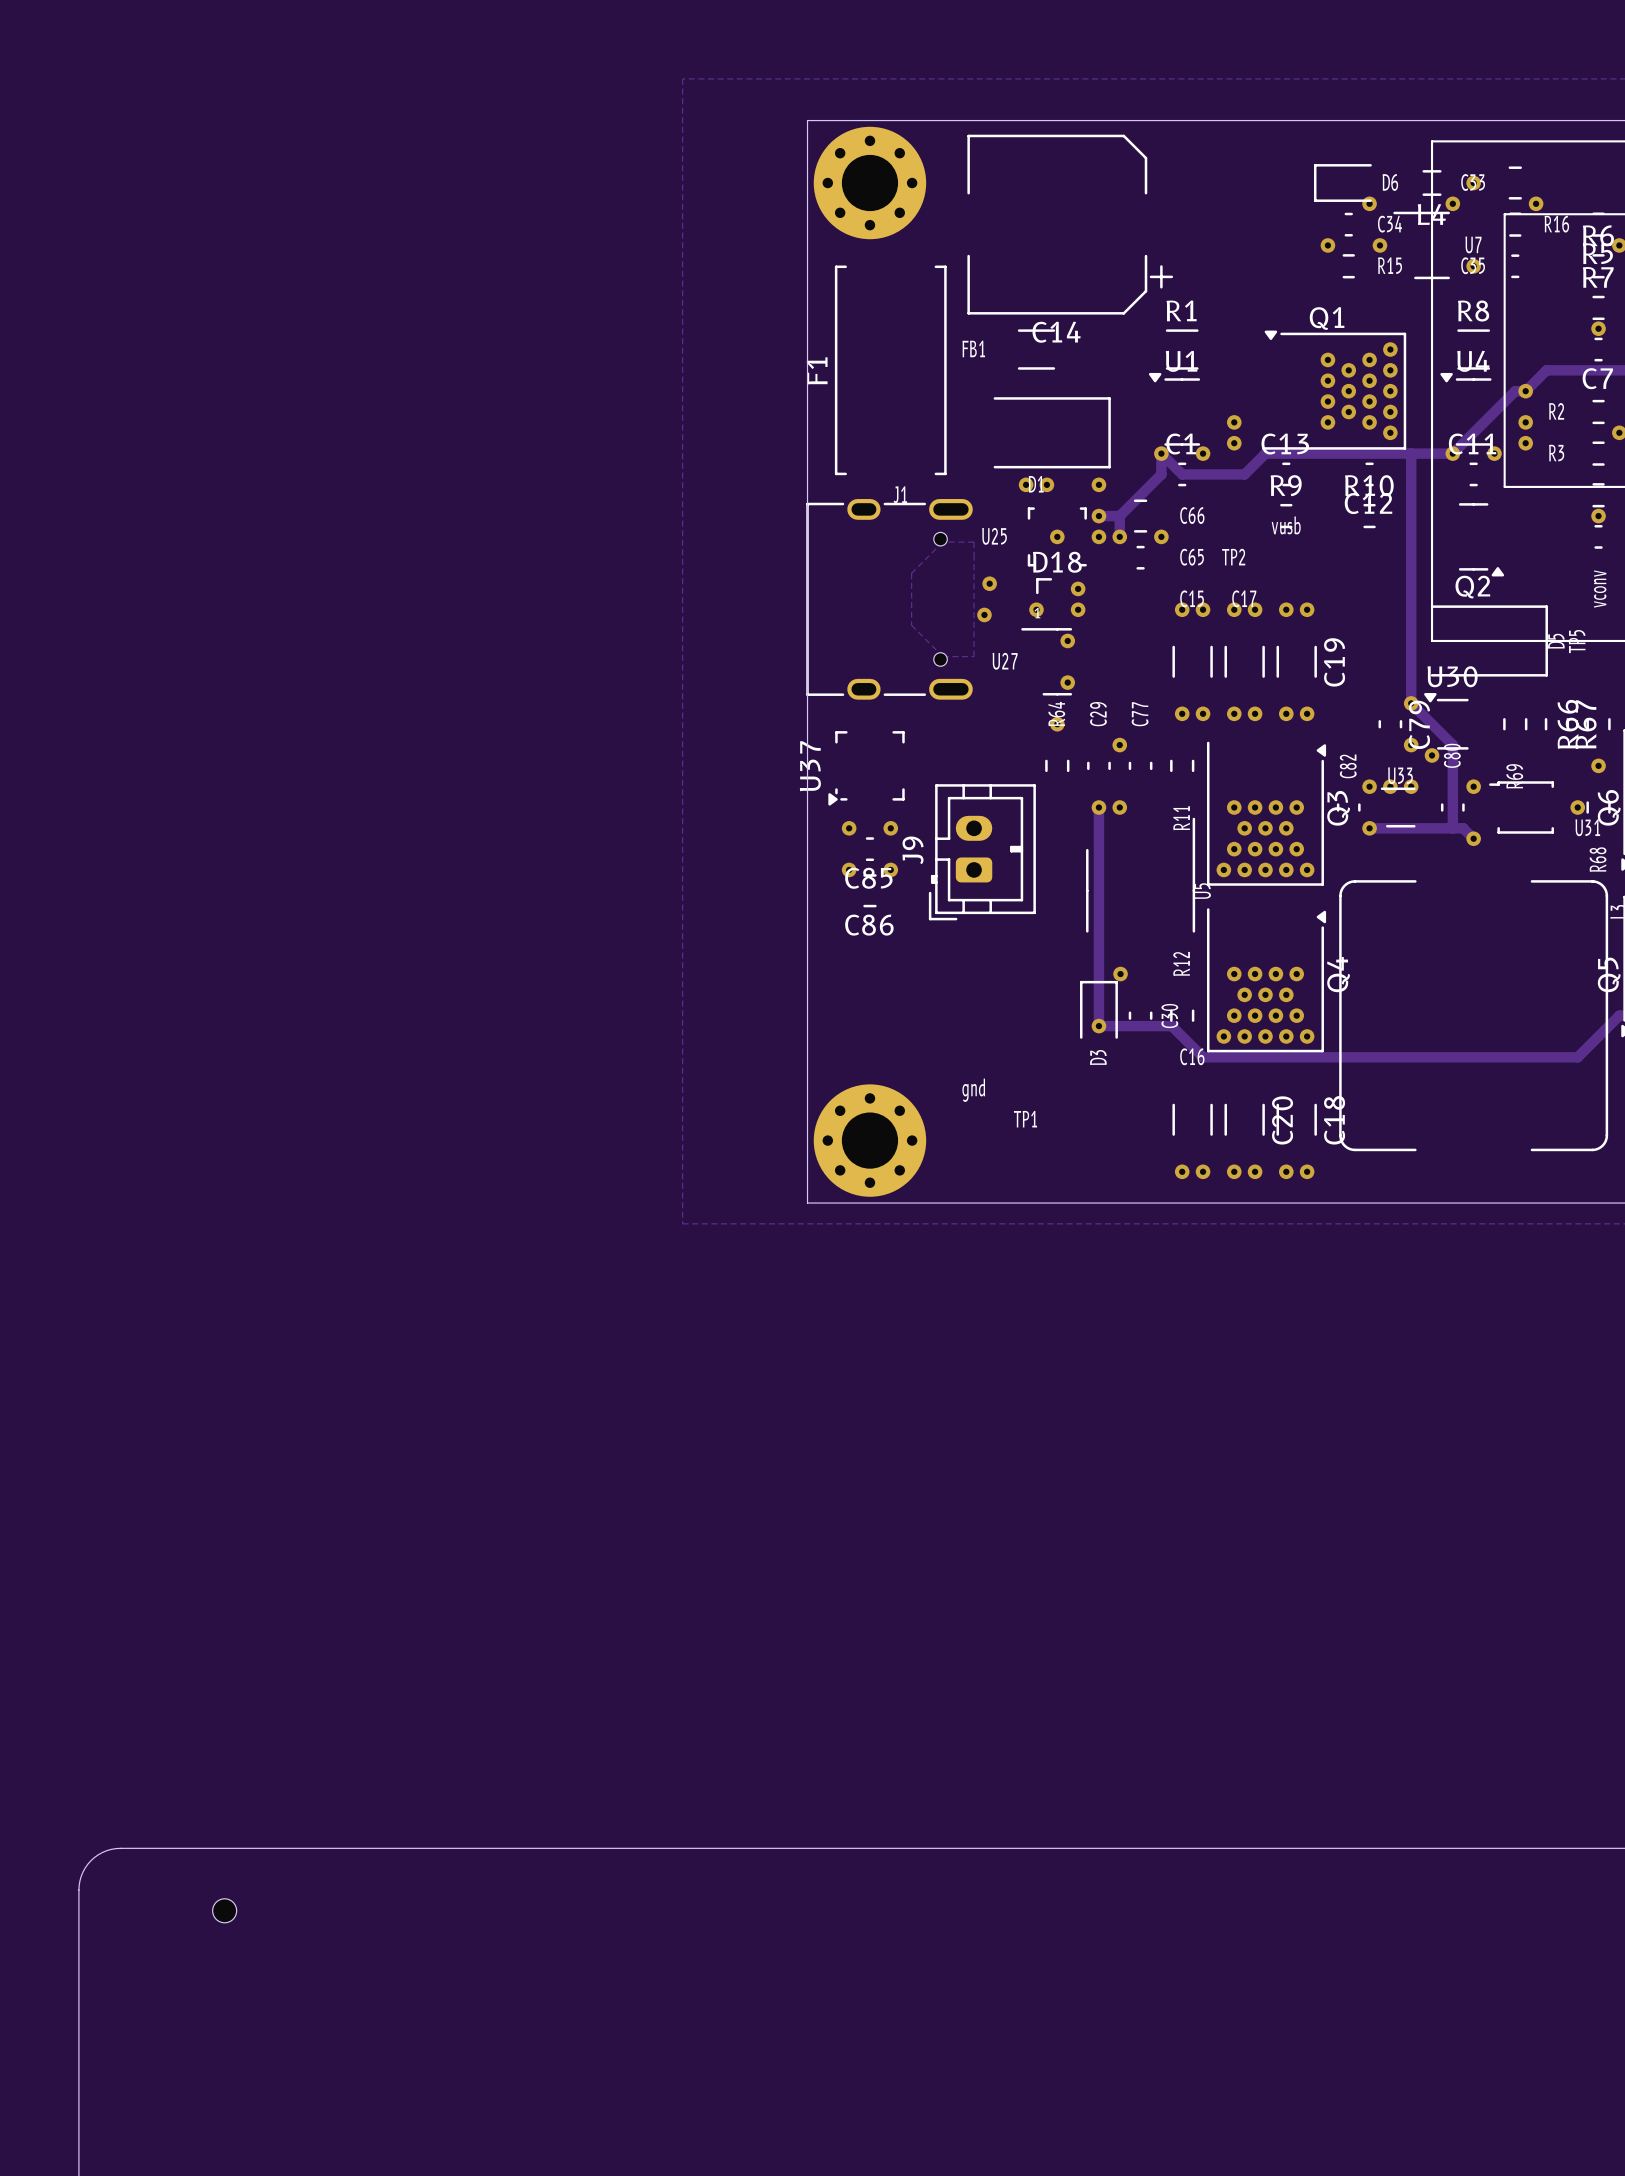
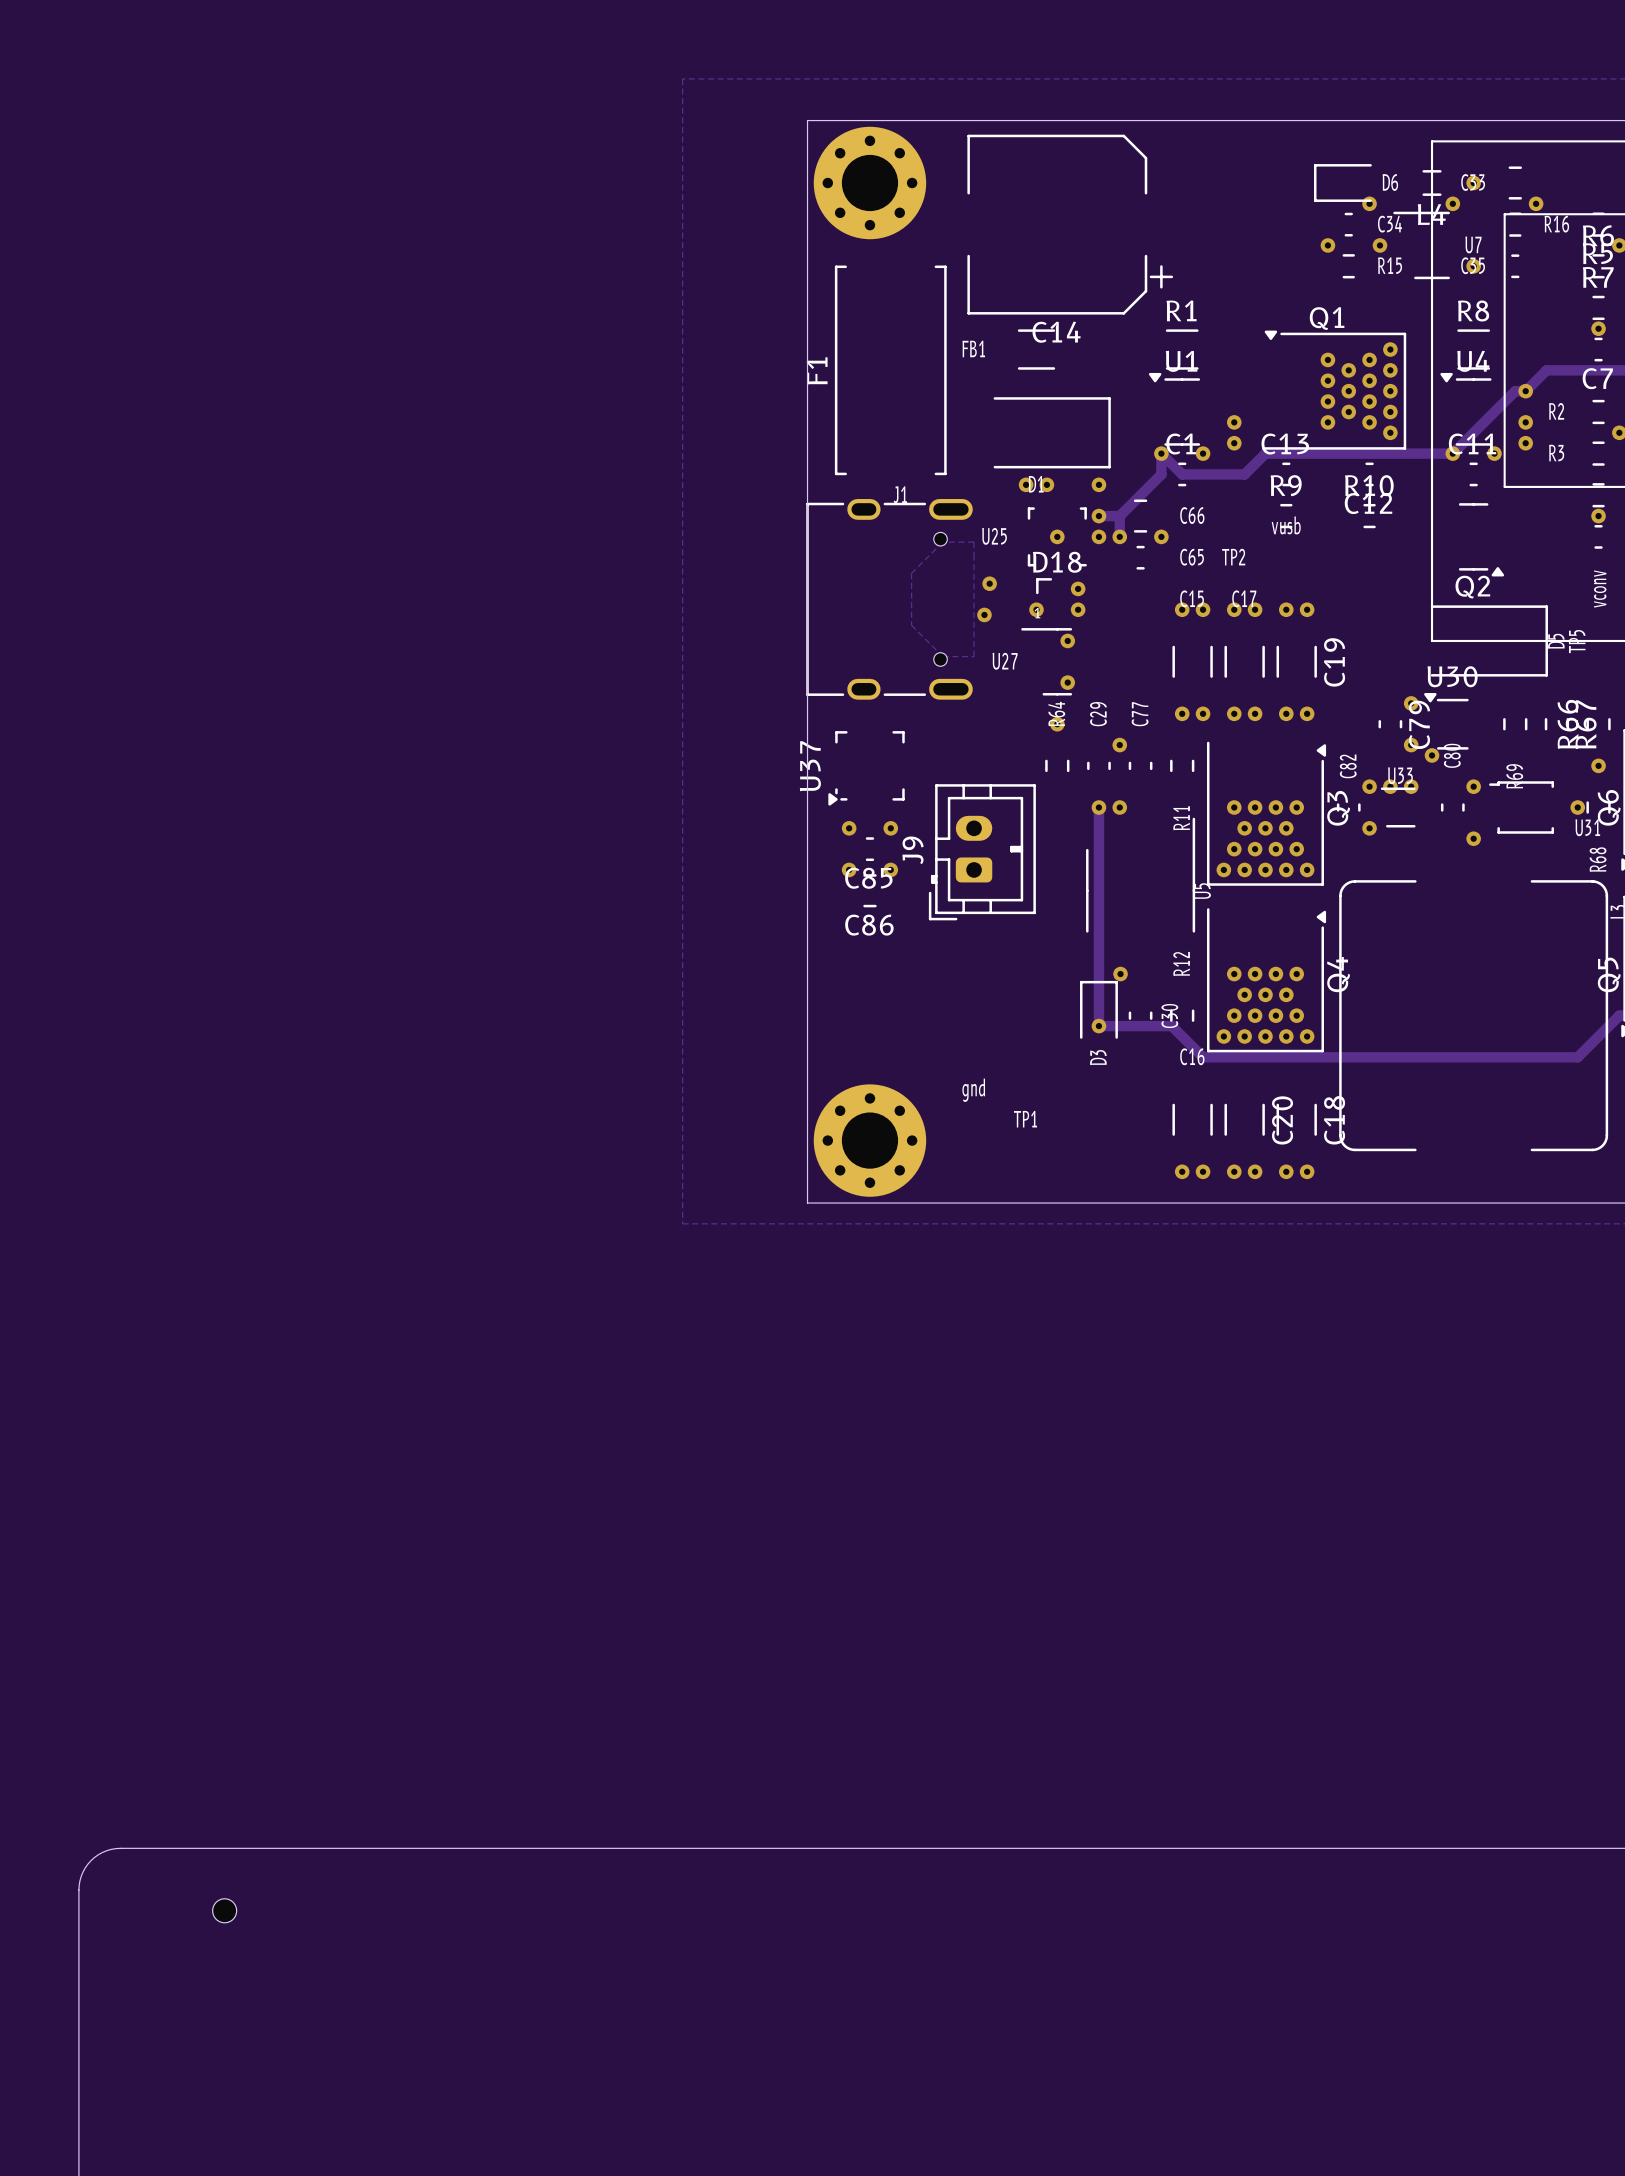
track: (1411, 453) (1411, 703) (1452, 745) (1452, 828) -> none
track: (1369, 828) (1463, 828) (1473, 838) -> none

